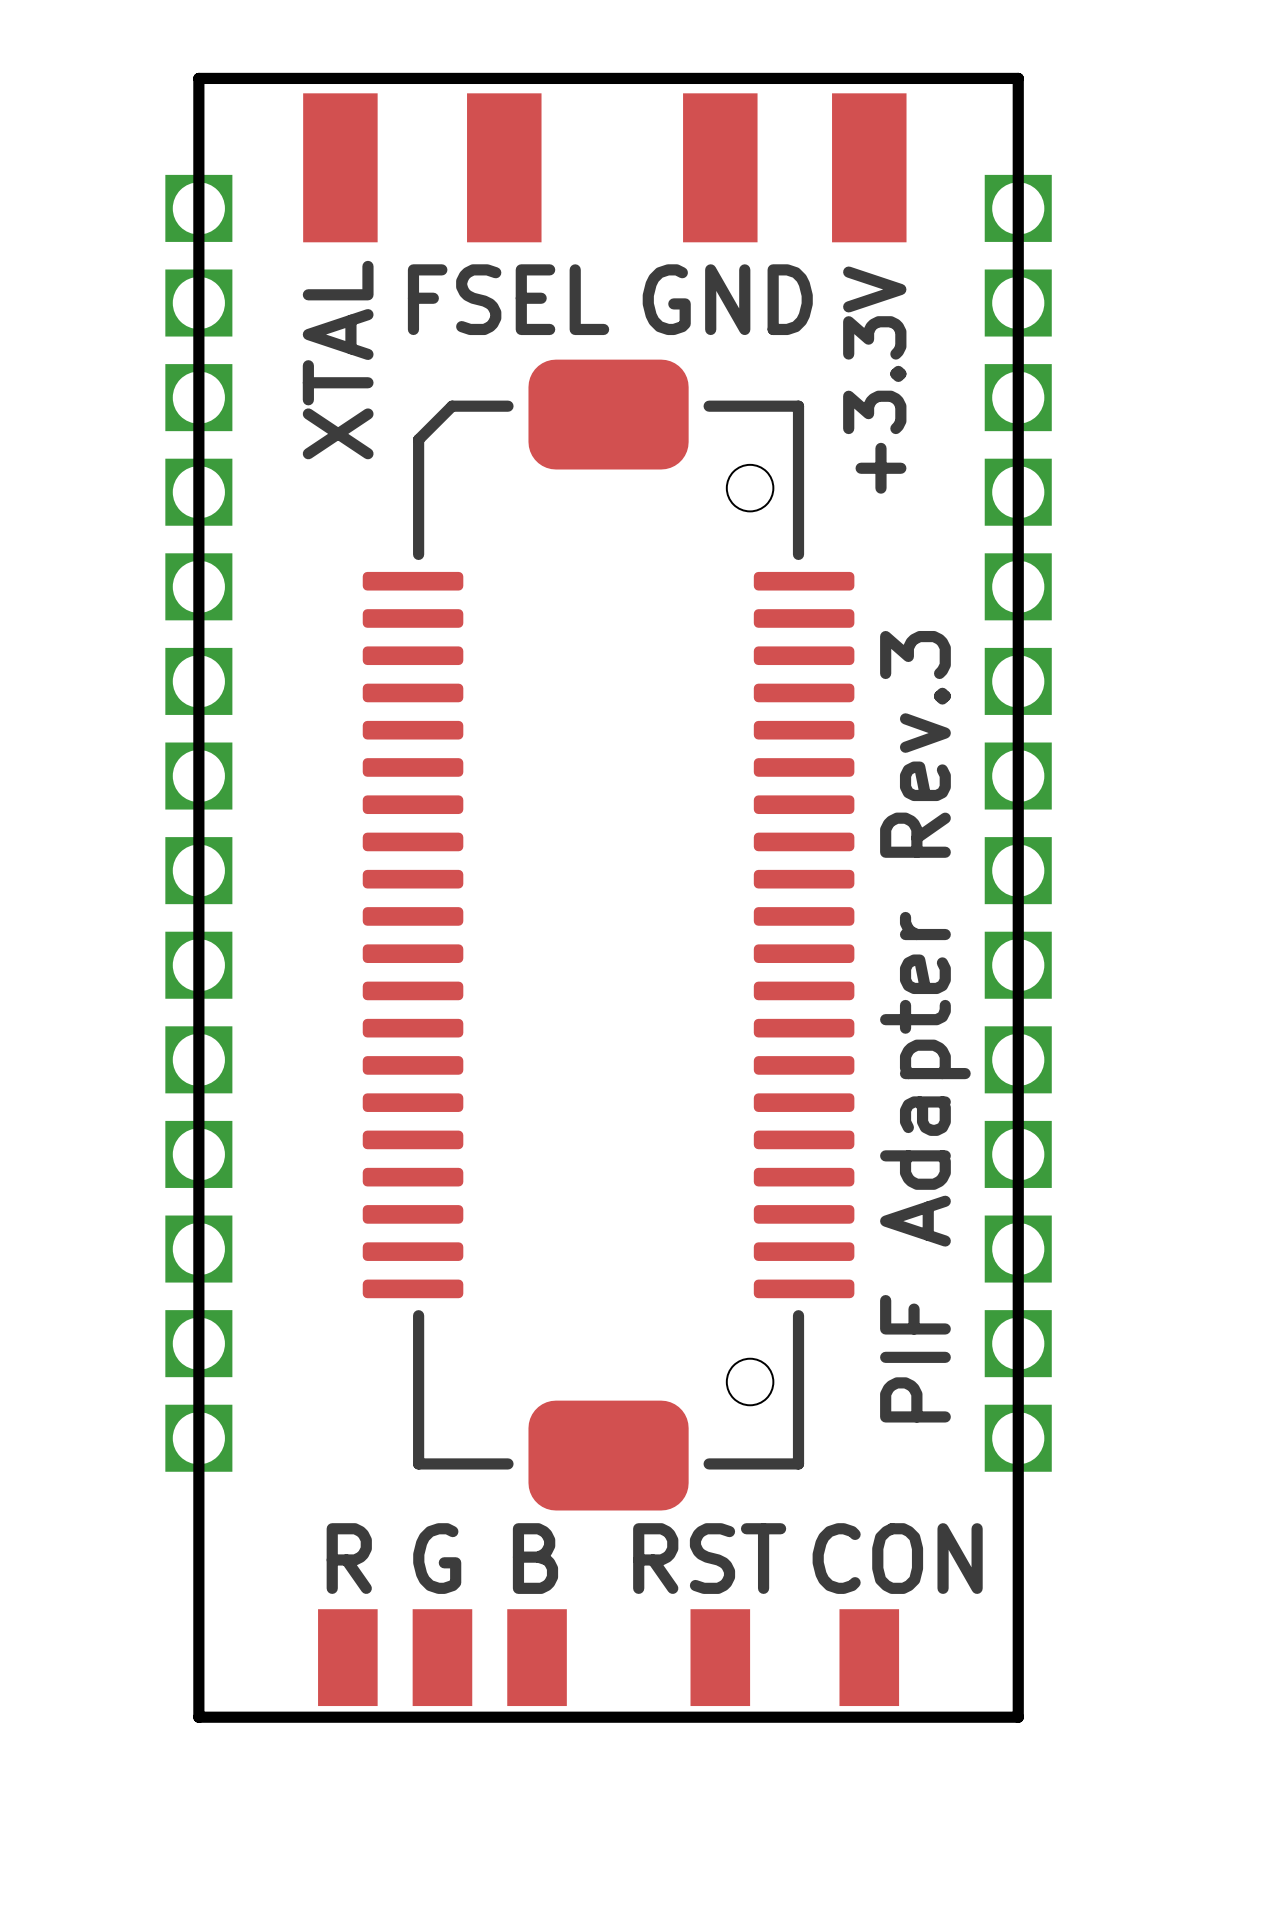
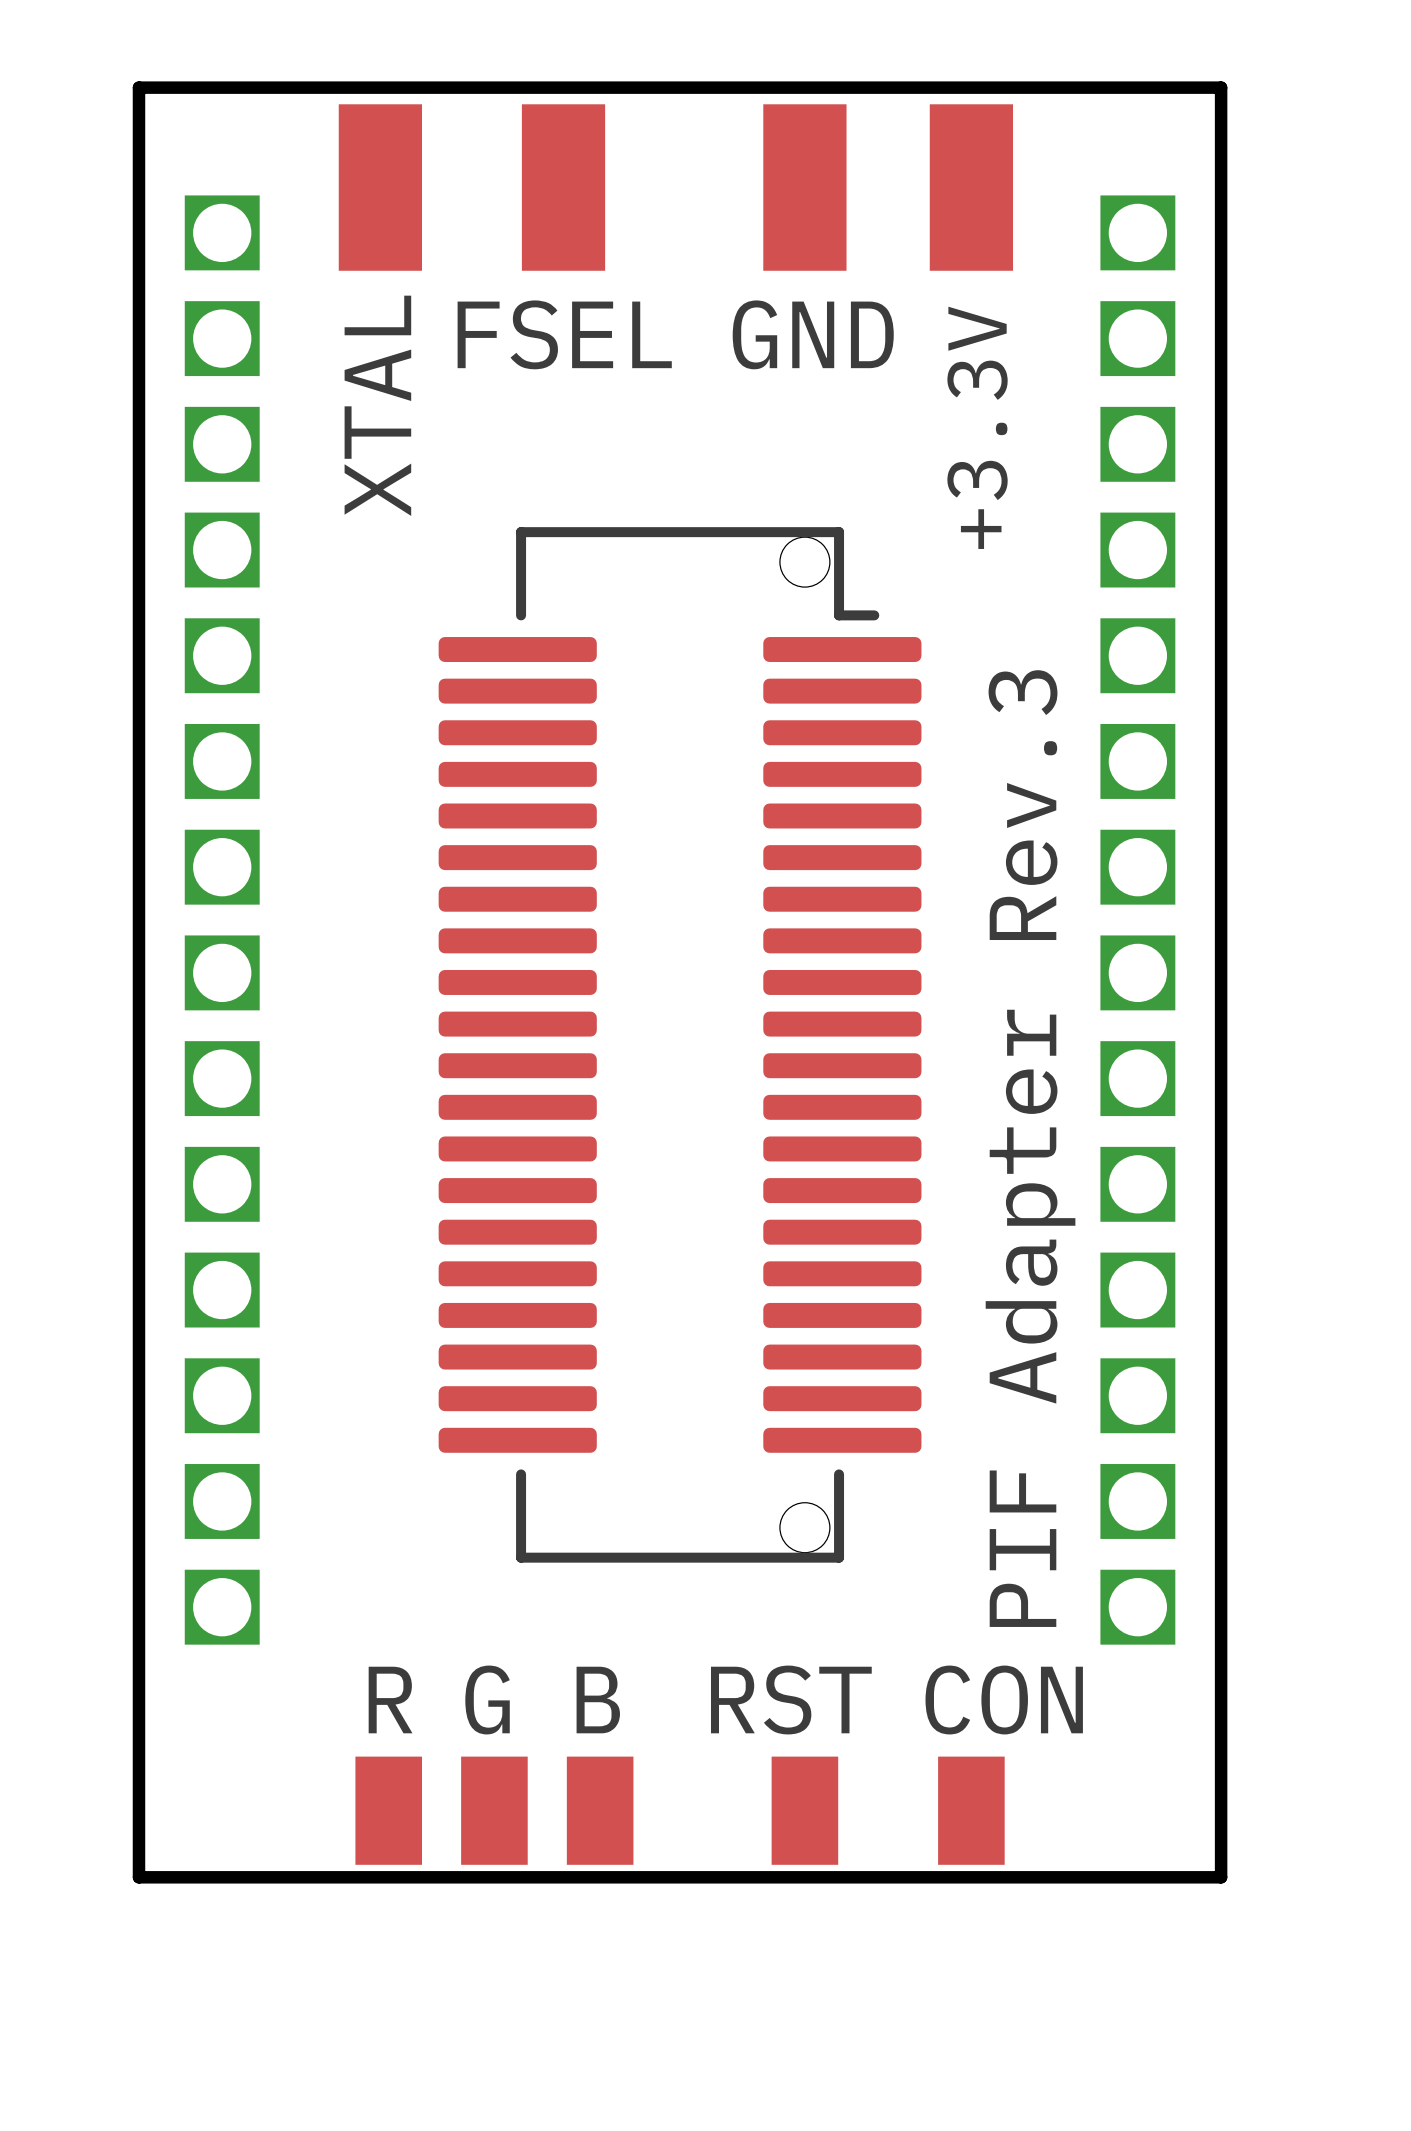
board edge: (198, 78) (198, 1717) (1018, 1717) (1018, 78) -> (222, 87) (138, 87) (138, 1877) (1221, 1877) (1221, 87) (1137, 87)
part footprint: [362, 359, 855, 1511] -> [438, 527, 922, 1563]
text position: R (349, 1558) -> R (390, 1700)
text position: G (437, 1558) -> G (487, 1700)
text position: B (535, 1558) -> B (598, 1700)
text position: RST (709, 1558) -> RST (791, 1700)
text position: CON (897, 1558) -> CON (1004, 1700)
part position: (347, 1657) -> (388, 1810)
part position: (442, 1657) -> (494, 1810)
part position: (537, 1657) -> (600, 1810)
part position: (720, 1657) -> (804, 1810)
part position: (869, 1657) -> (971, 1810)

